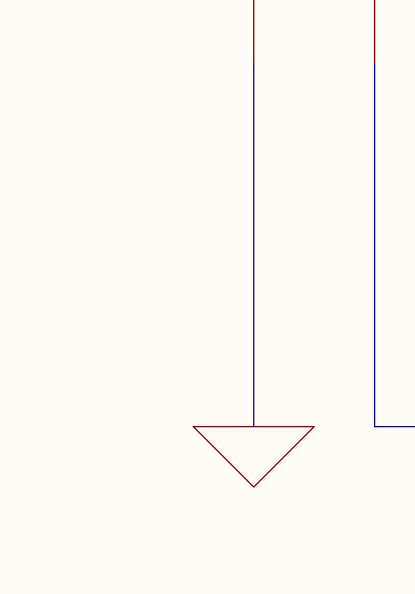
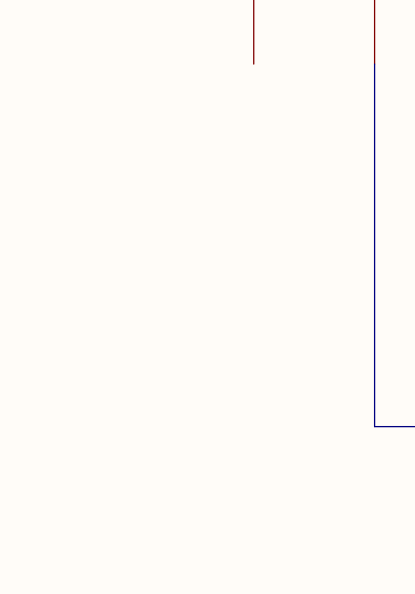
wire: (253, 64) (253, 426) -> none
power symbol: (253, 456) -> none

